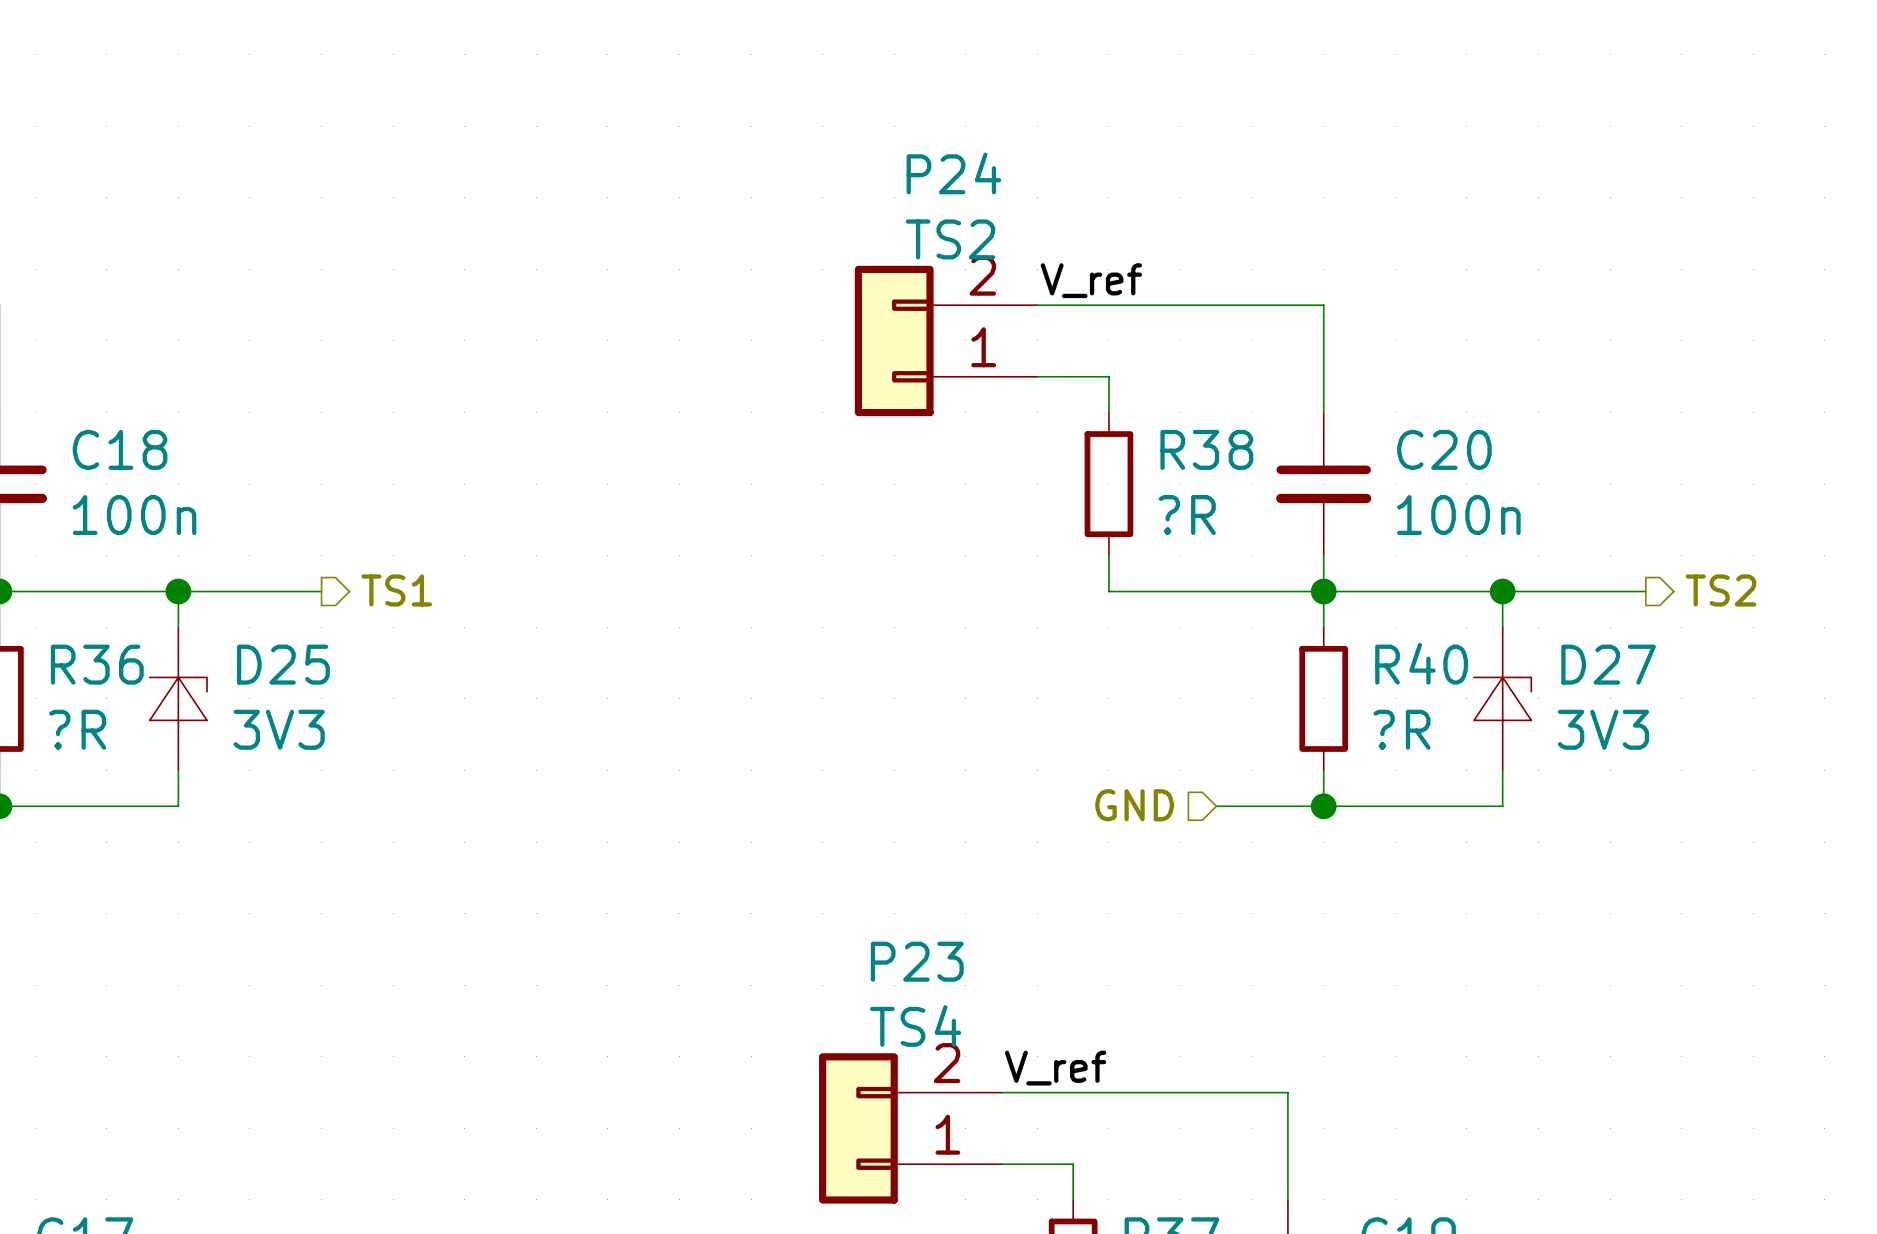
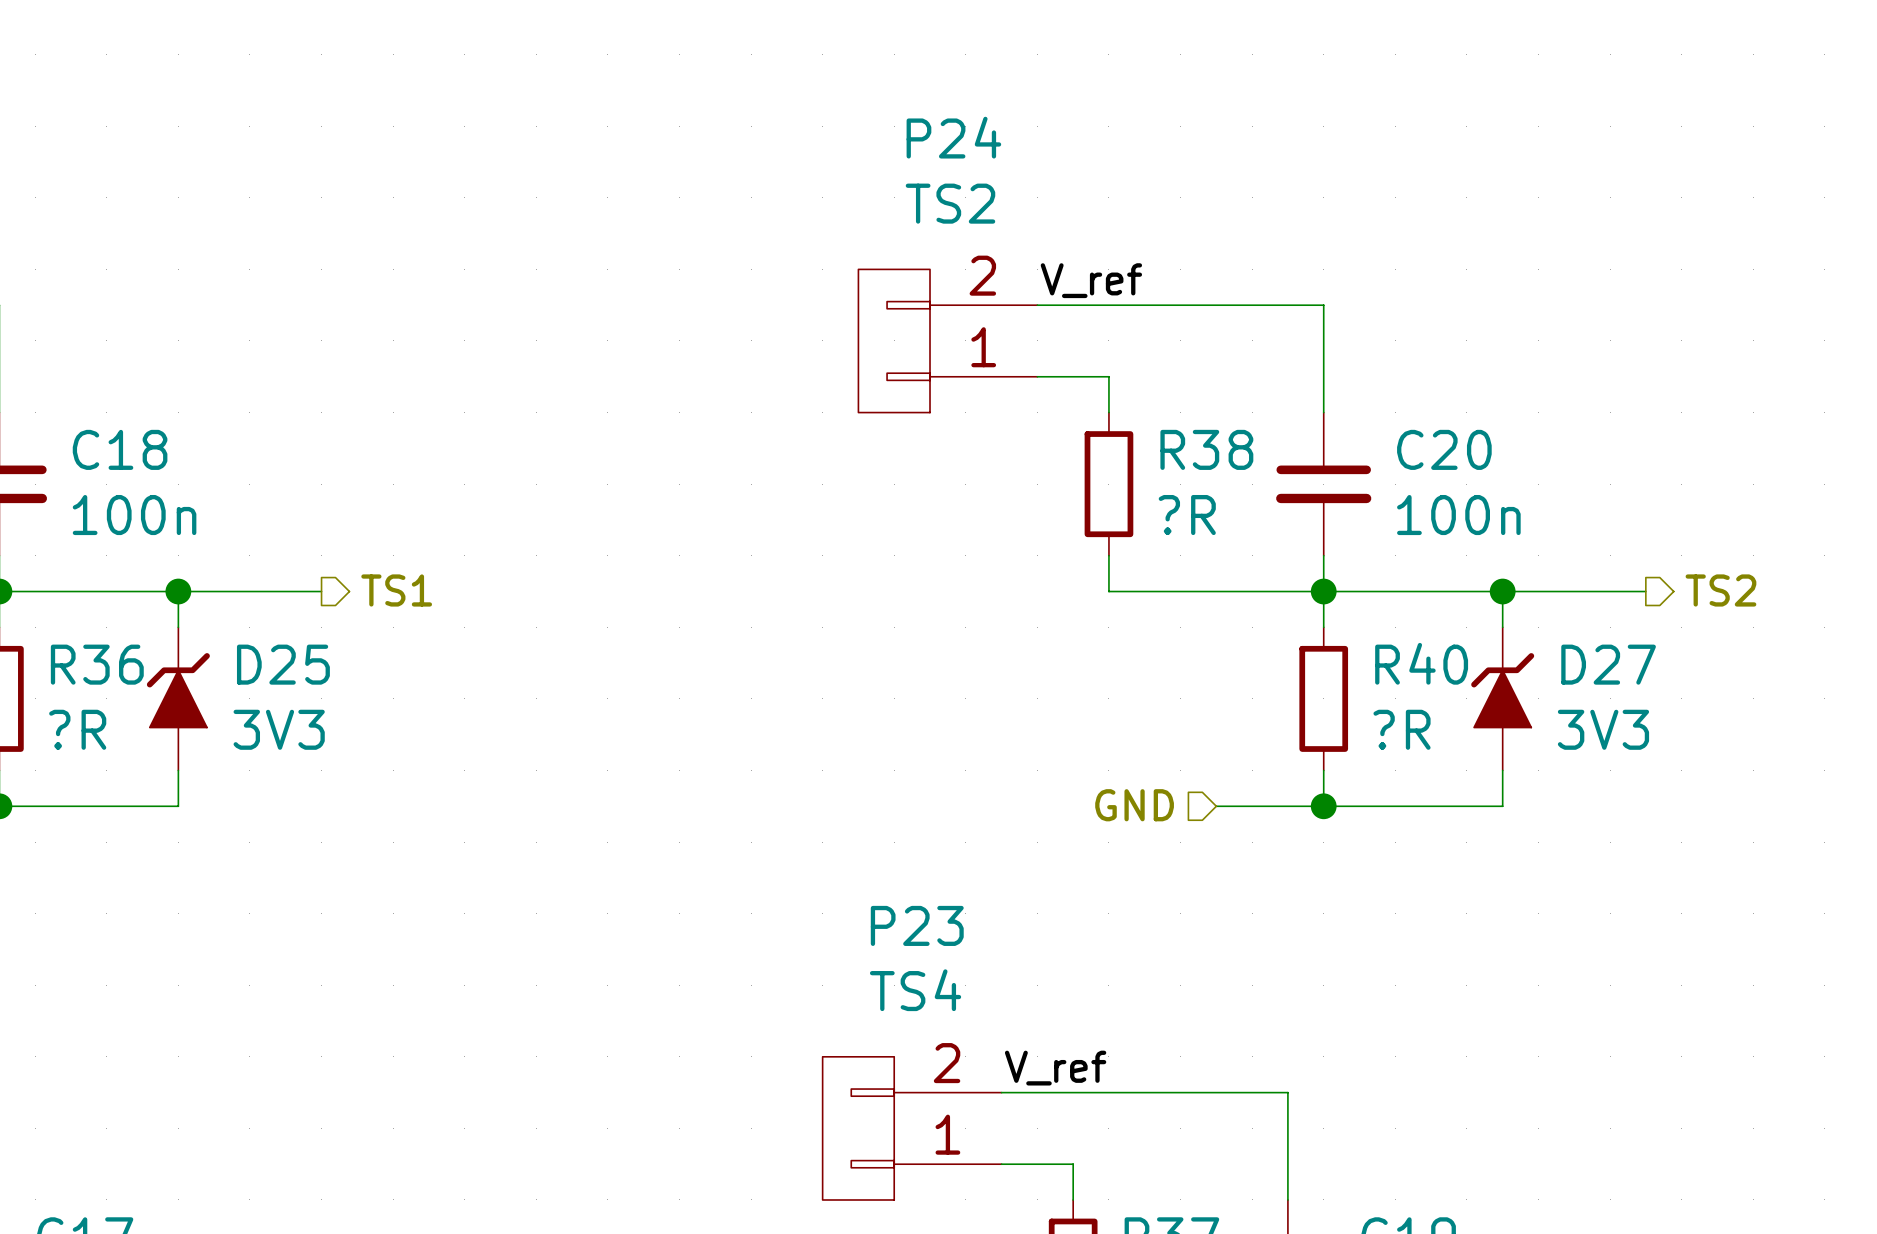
P24 symbol: [854, 265, 1038, 417] -> [858, 269, 1038, 413]
D25 symbol: [149, 627, 208, 771] -> [146, 627, 210, 771]
D27 symbol: [1474, 627, 1532, 771] -> [1471, 627, 1535, 771]
P23 symbol: [819, 1053, 1002, 1204] -> [822, 1056, 1002, 1200]

